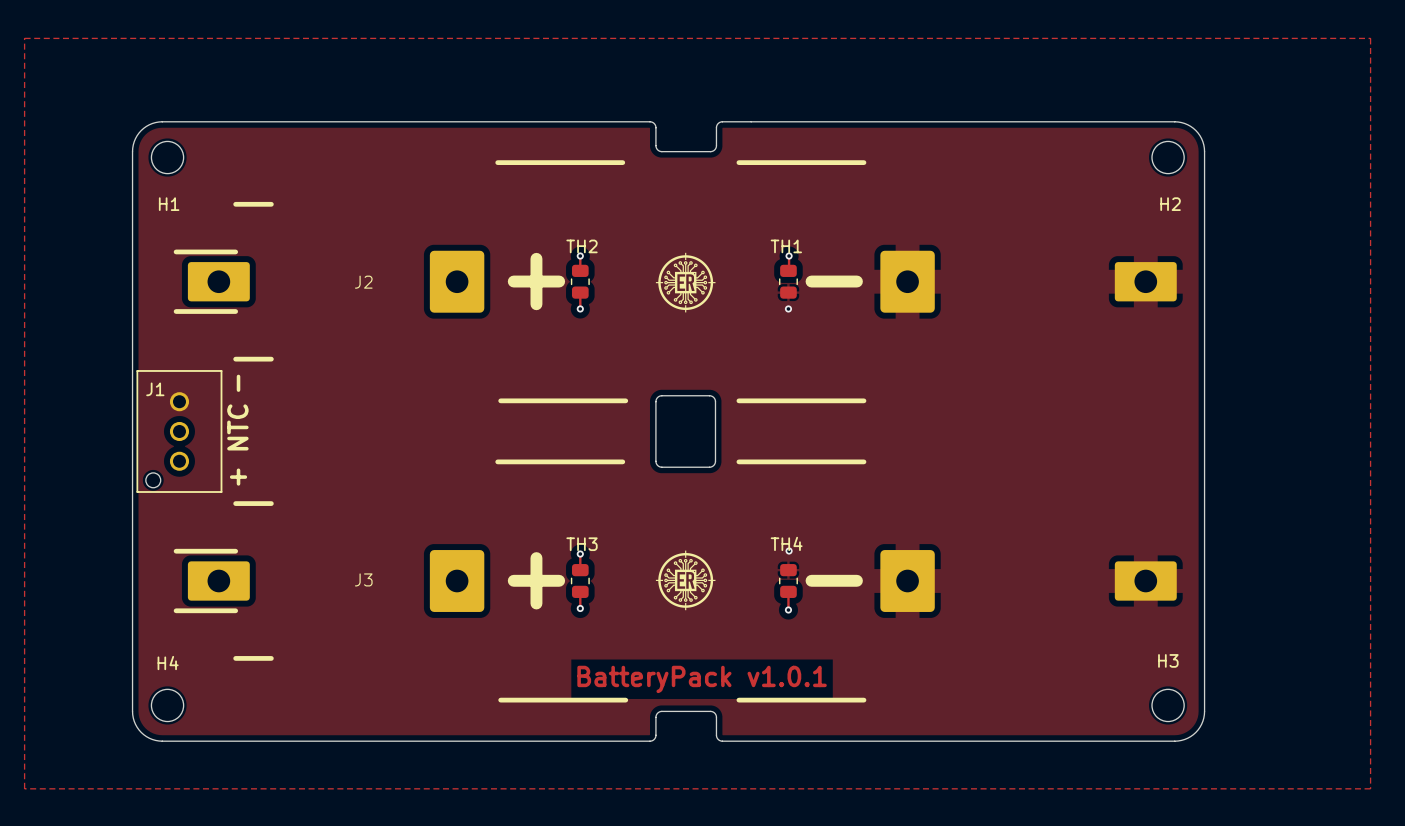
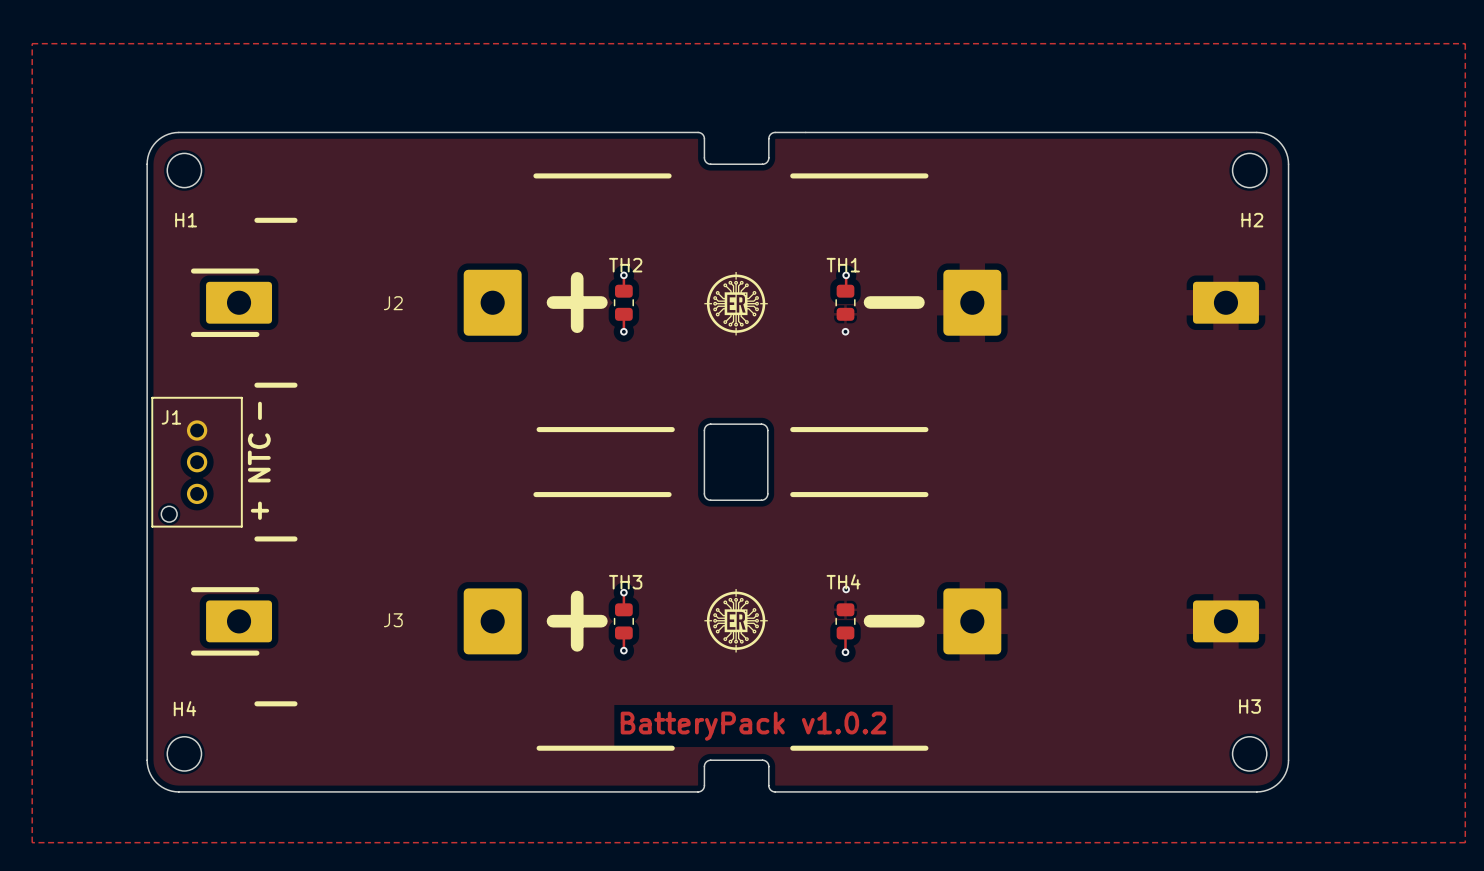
text: BatteryPack v1.0.1 (702, 679) -> BatteryPack v1.0.2 (753, 726)

